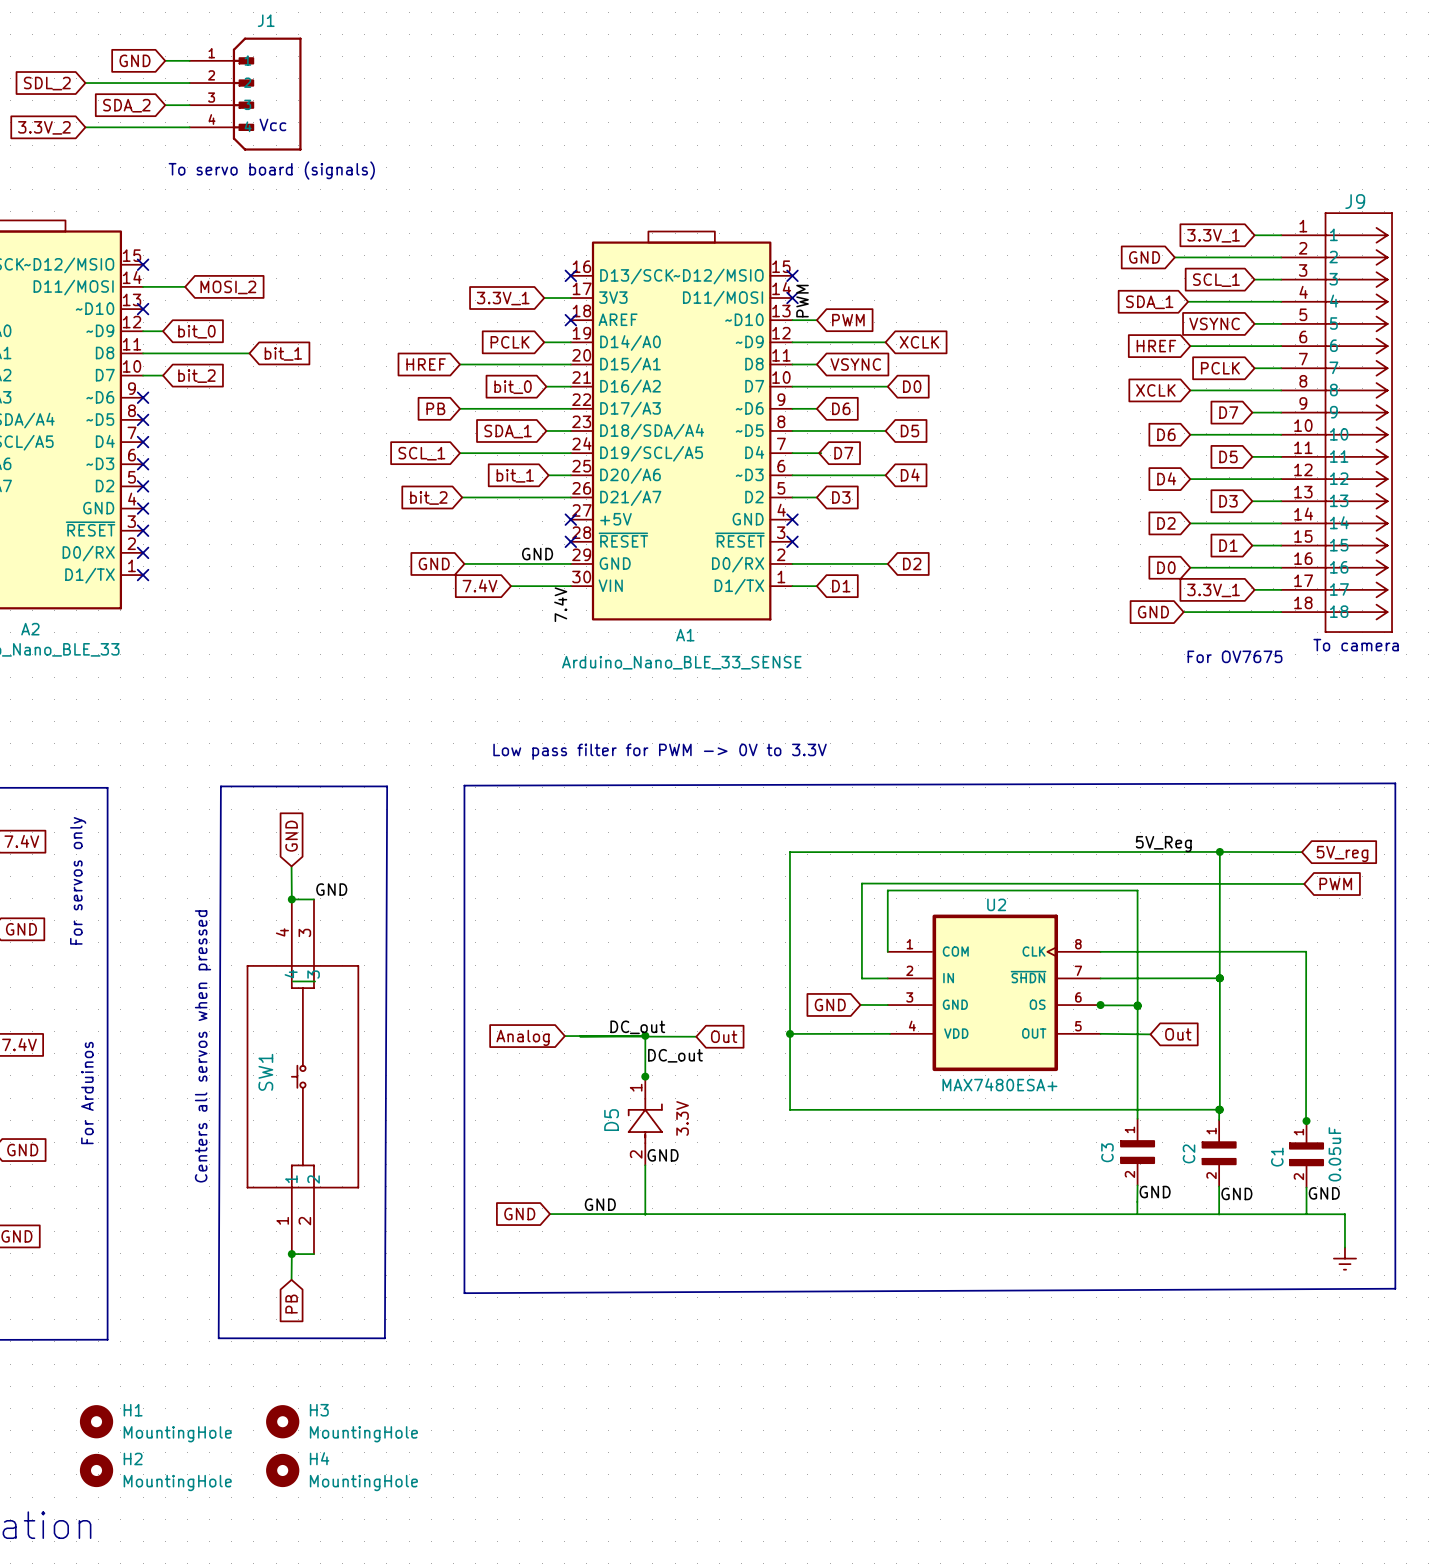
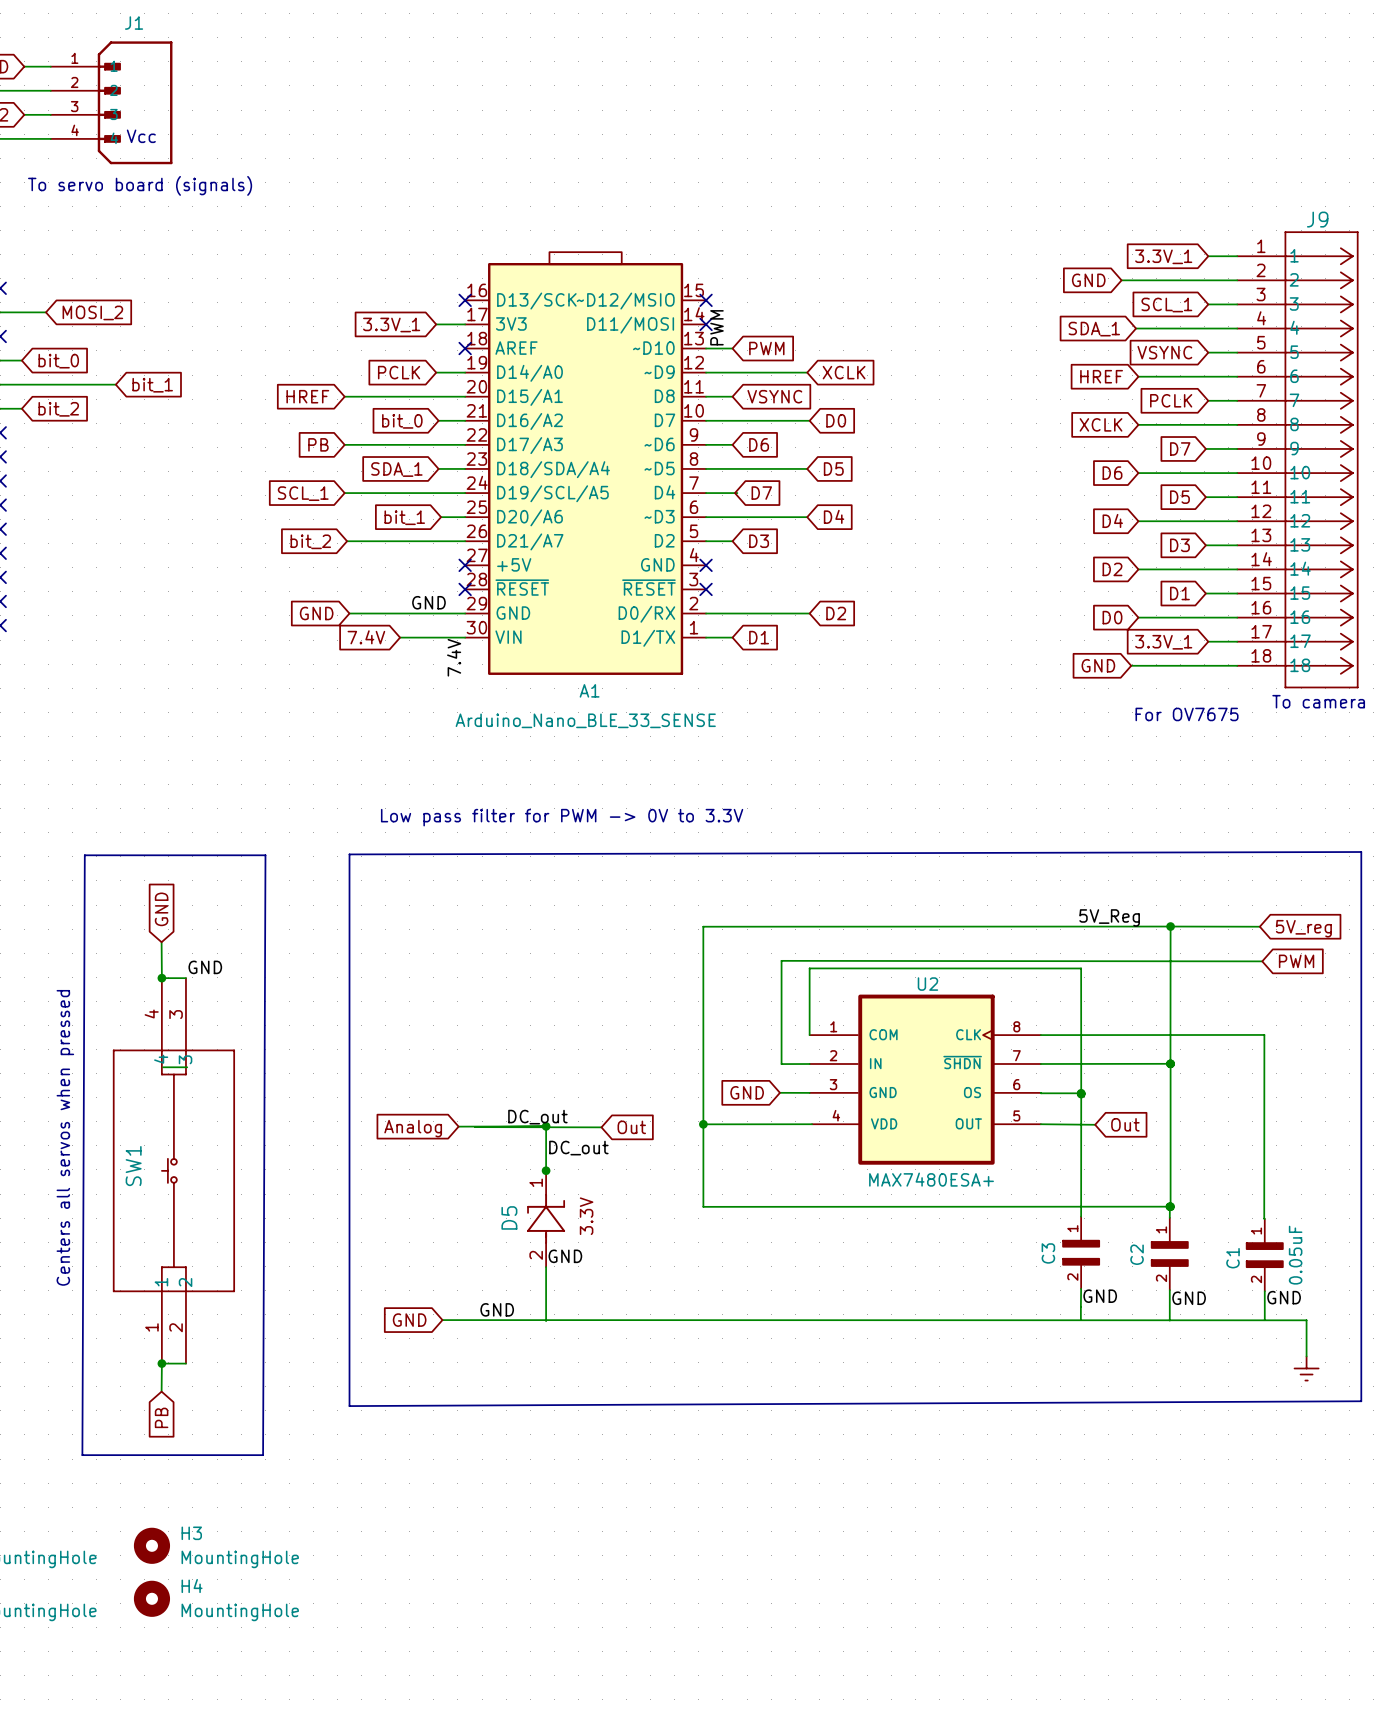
junction: (1100, 1005) -> none
junction: (1306, 1121) -> none

